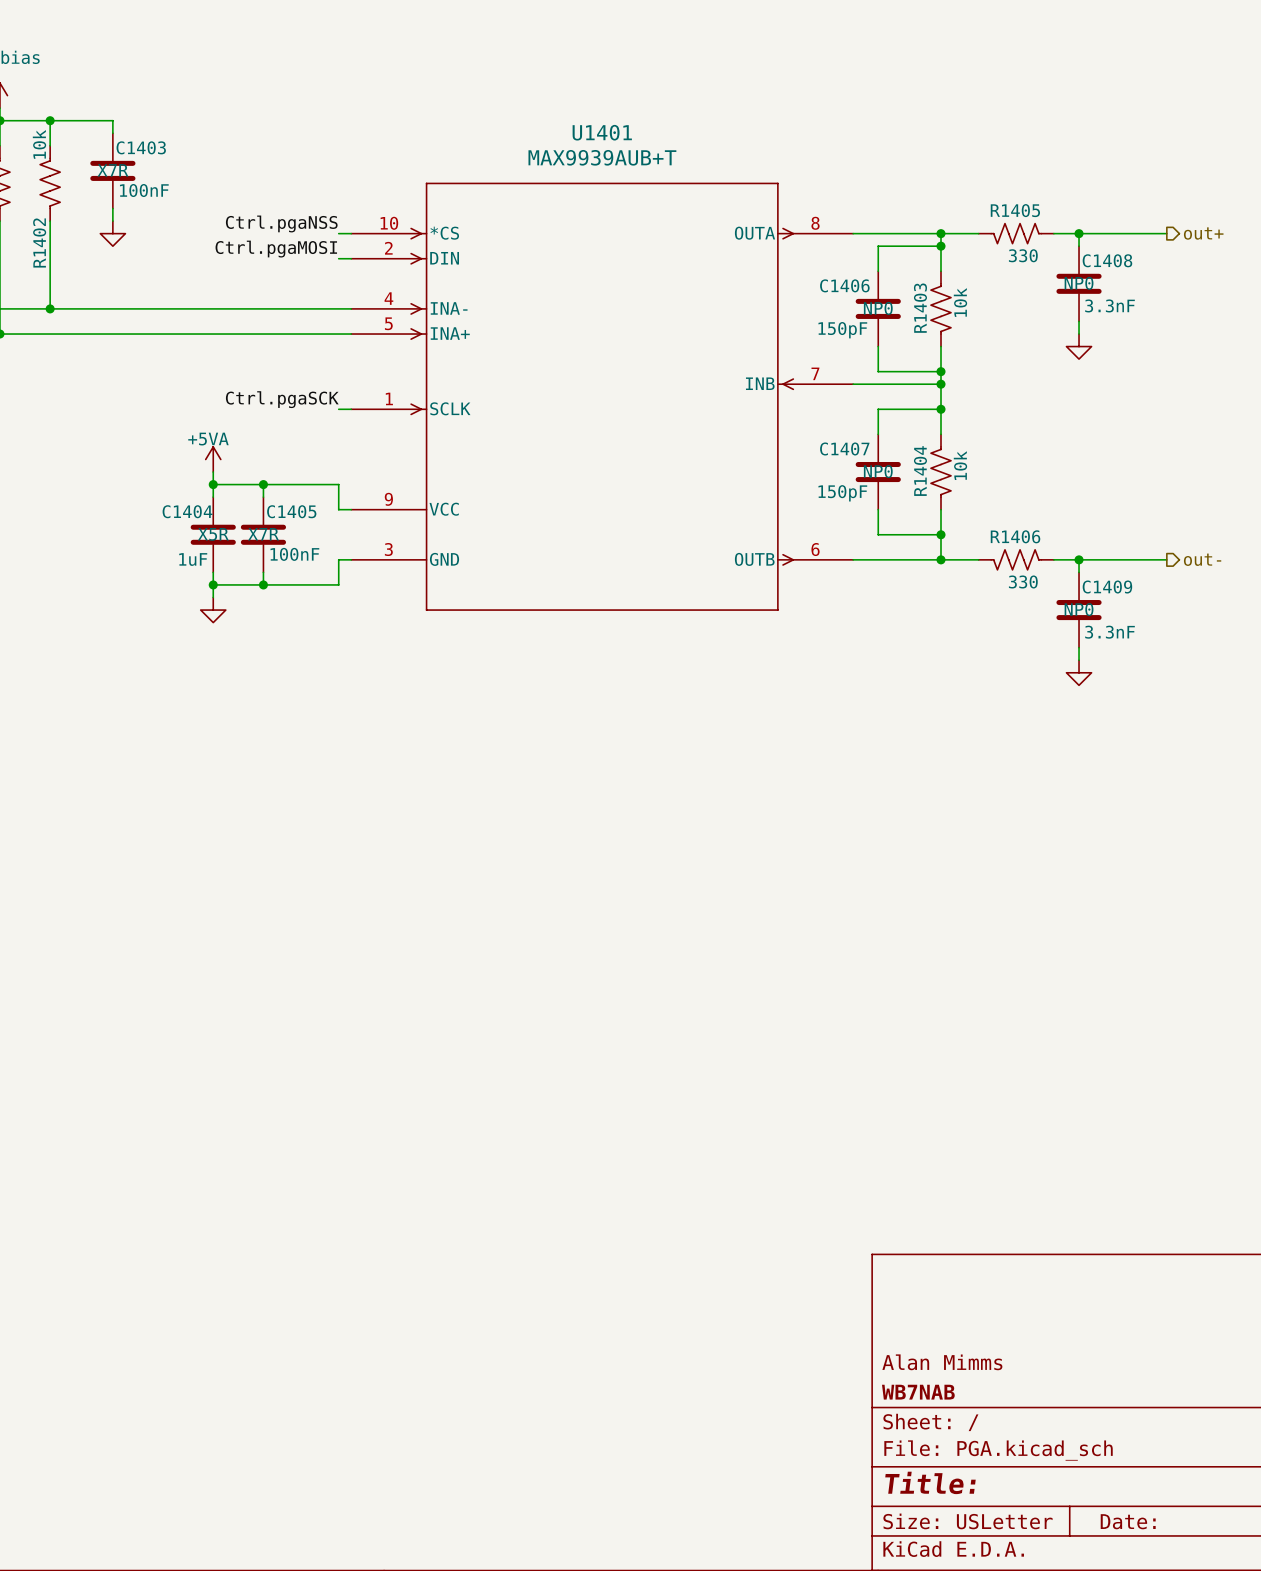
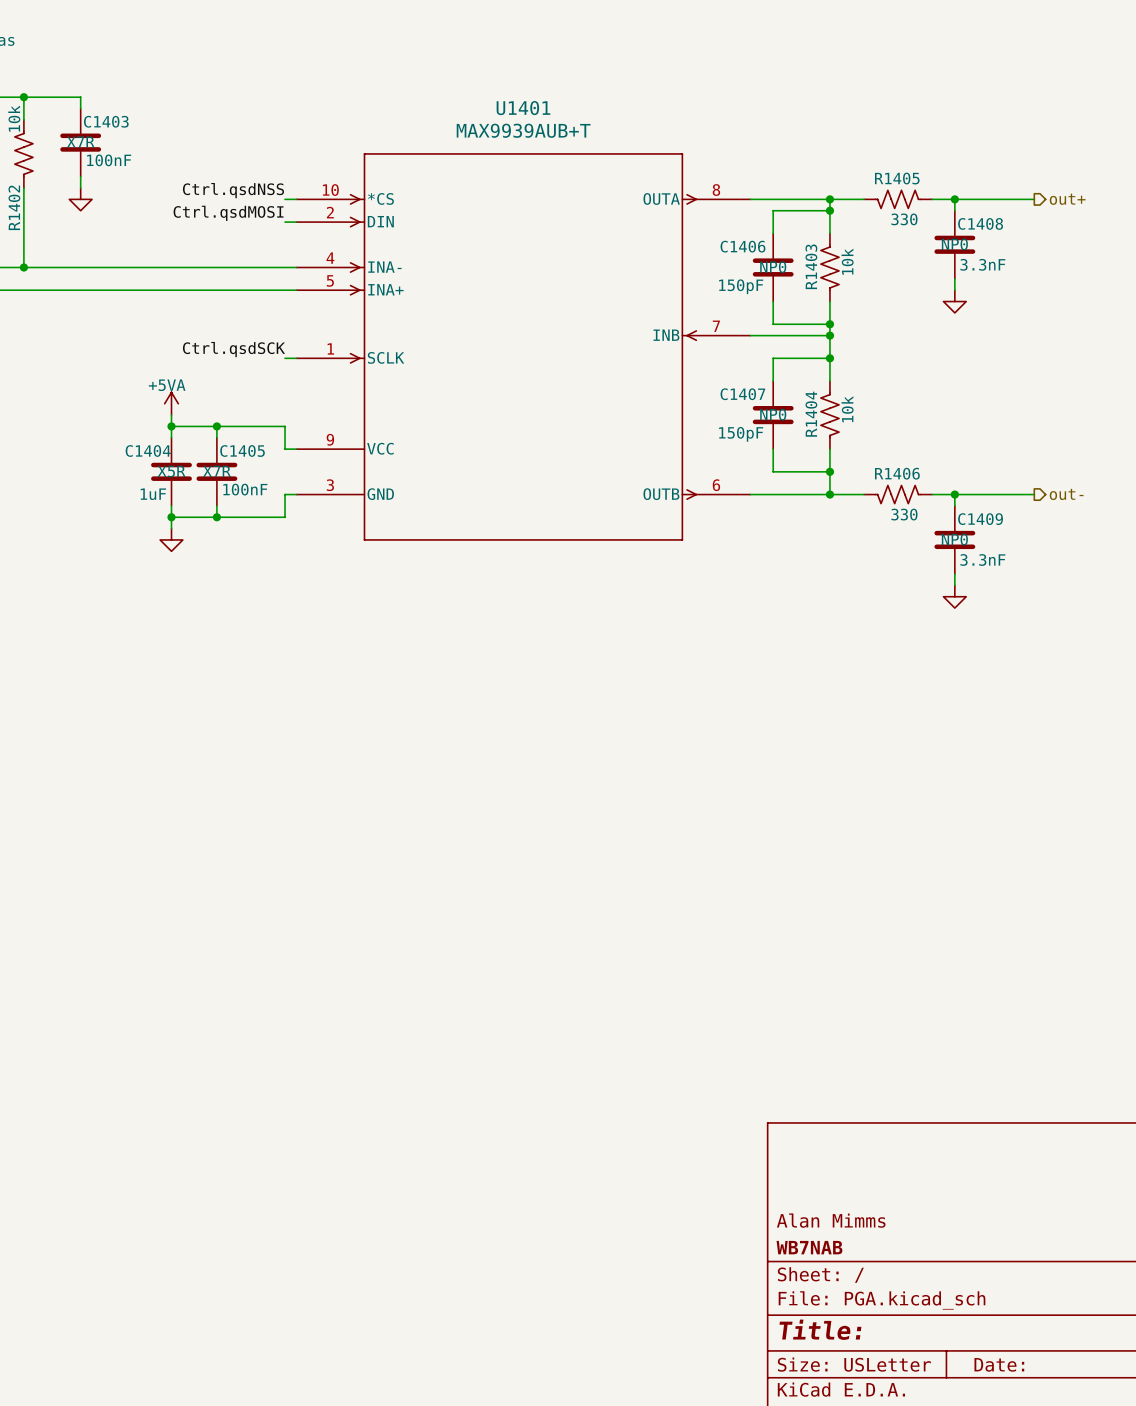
label: Ctrl.pgaNSS (281, 223) -> Ctrl.qsdNSS (233, 190)
label: Ctrl.pgaMOSI (276, 249) -> Ctrl.qsdMOSI (228, 213)
label: Ctrl.pgaSCK (282, 399) -> Ctrl.qsdSCK (233, 349)

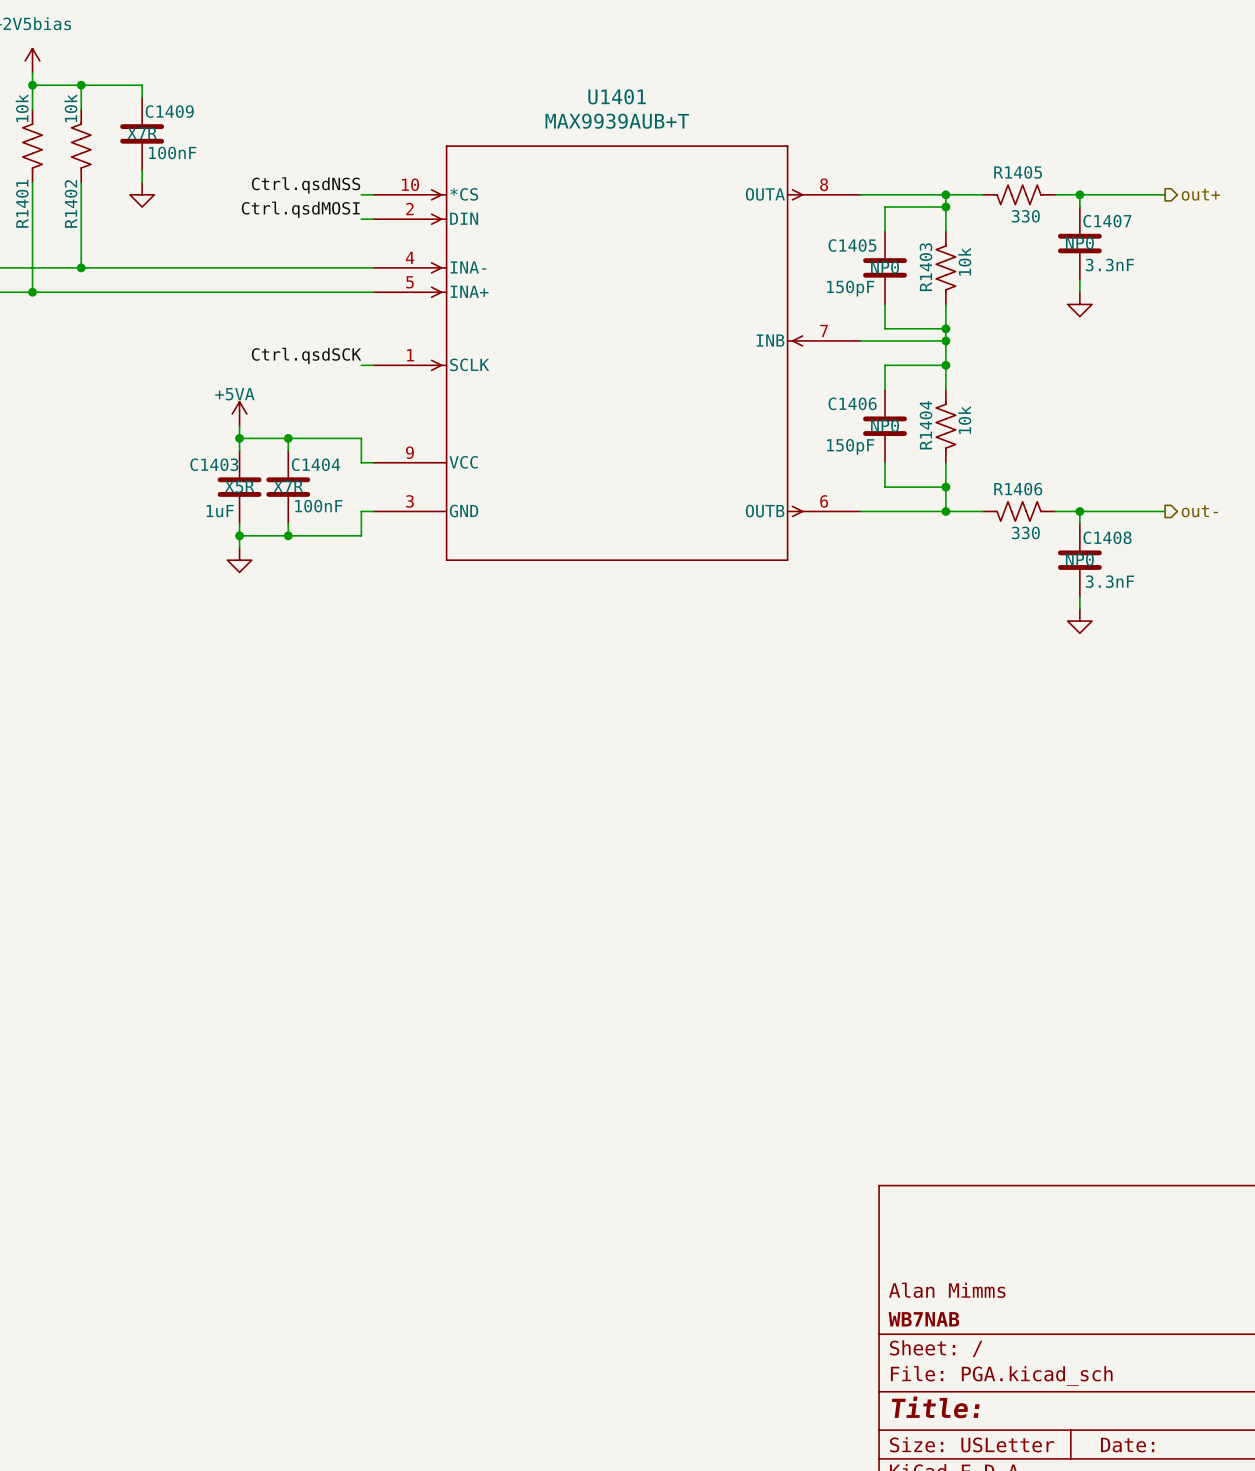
C1403 name: C1403 (106, 121) -> C1409 (169, 111)
C1408 name: C1408 (980, 223) -> C1407 (1107, 221)
C1406 name: C1406 (742, 246) -> C1405 (852, 245)
C1407 name: C1407 (742, 394) -> C1406 (852, 403)
C1404 name: C1404 (148, 450) -> C1403 (214, 464)
C1405 name: C1405 (242, 450) -> C1404 (316, 464)
C1409 name: C1409 (980, 519) -> C1408 (1107, 537)

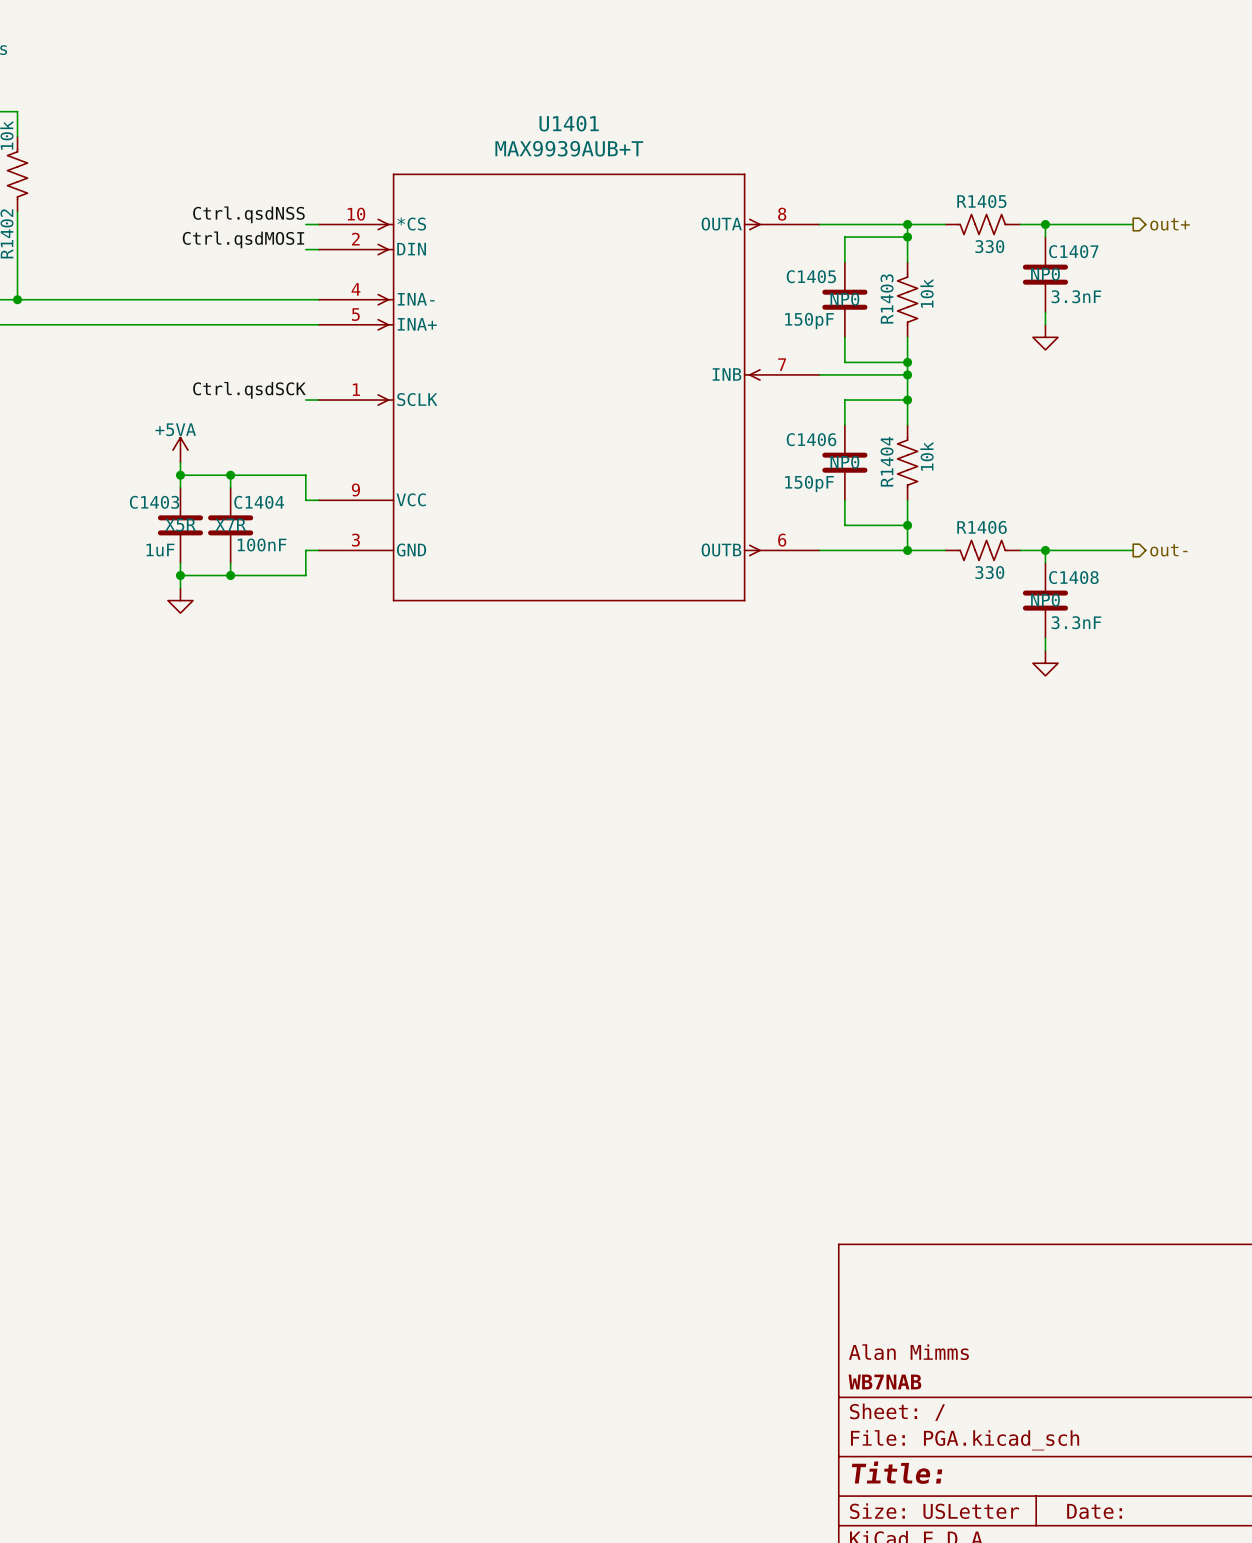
wire: (81, 85) (142, 85) (142, 97) -> none
junction: (81, 85) -> none
C1409: 100nF (142, 133) -> none
wire: (142, 170) (142, 182) -> none
power symbol: (142, 194) -> none

